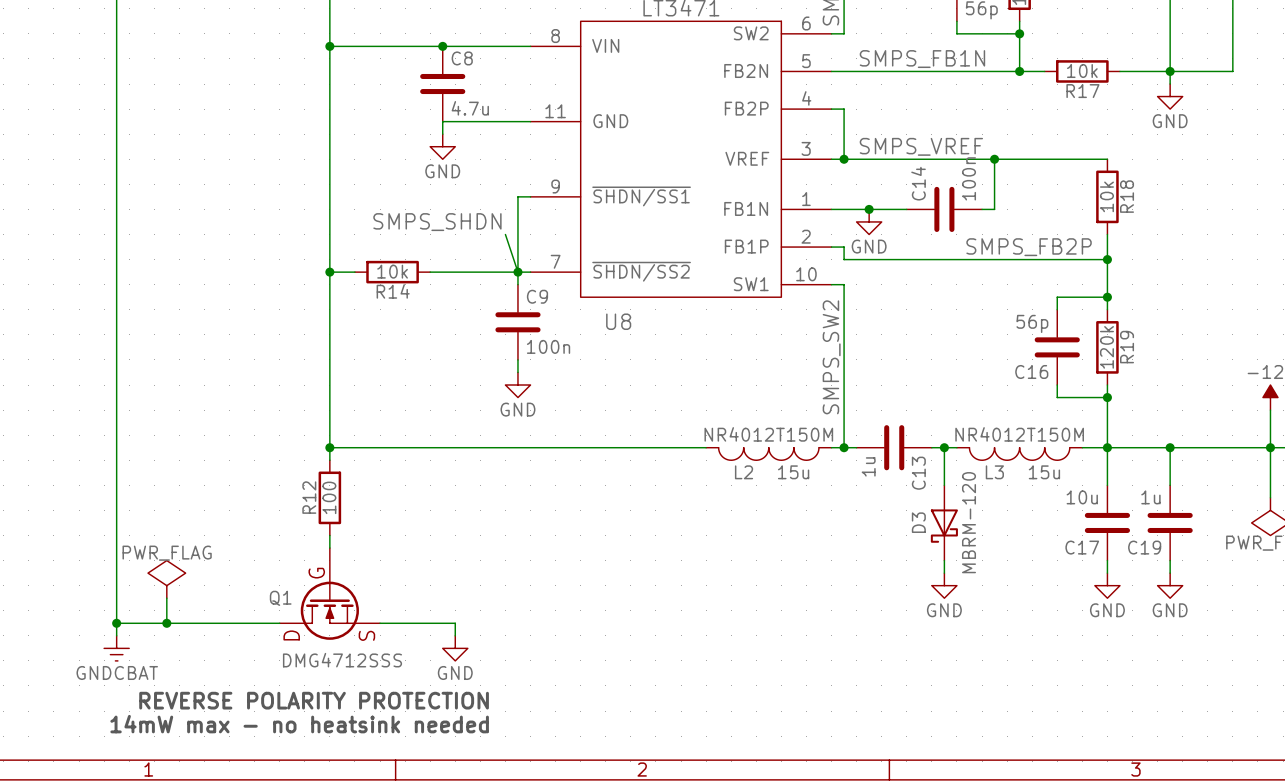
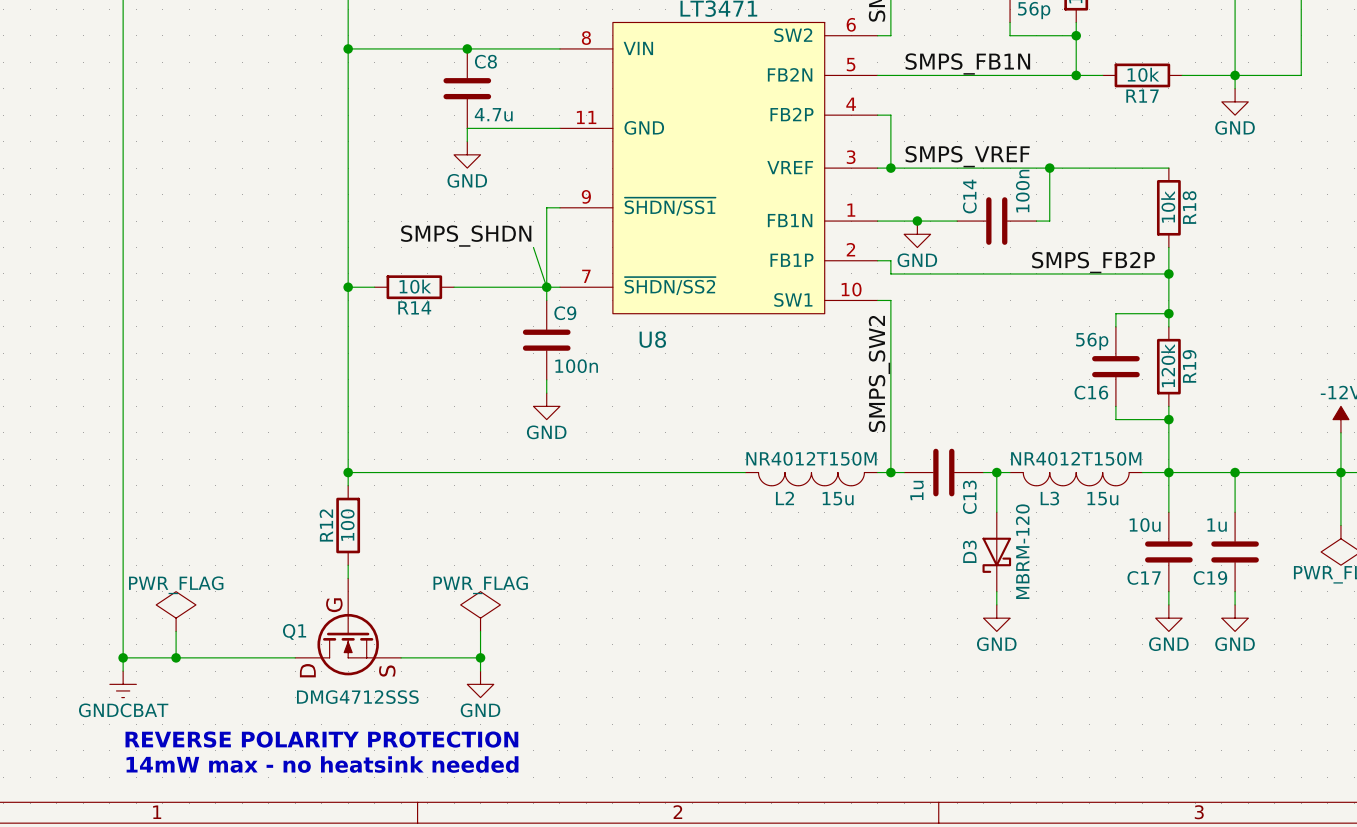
power symbol: none -> PWR_FLAG (480, 611)
wire: none -> (480, 631) (480, 657)
junction: none -> (480, 657)

